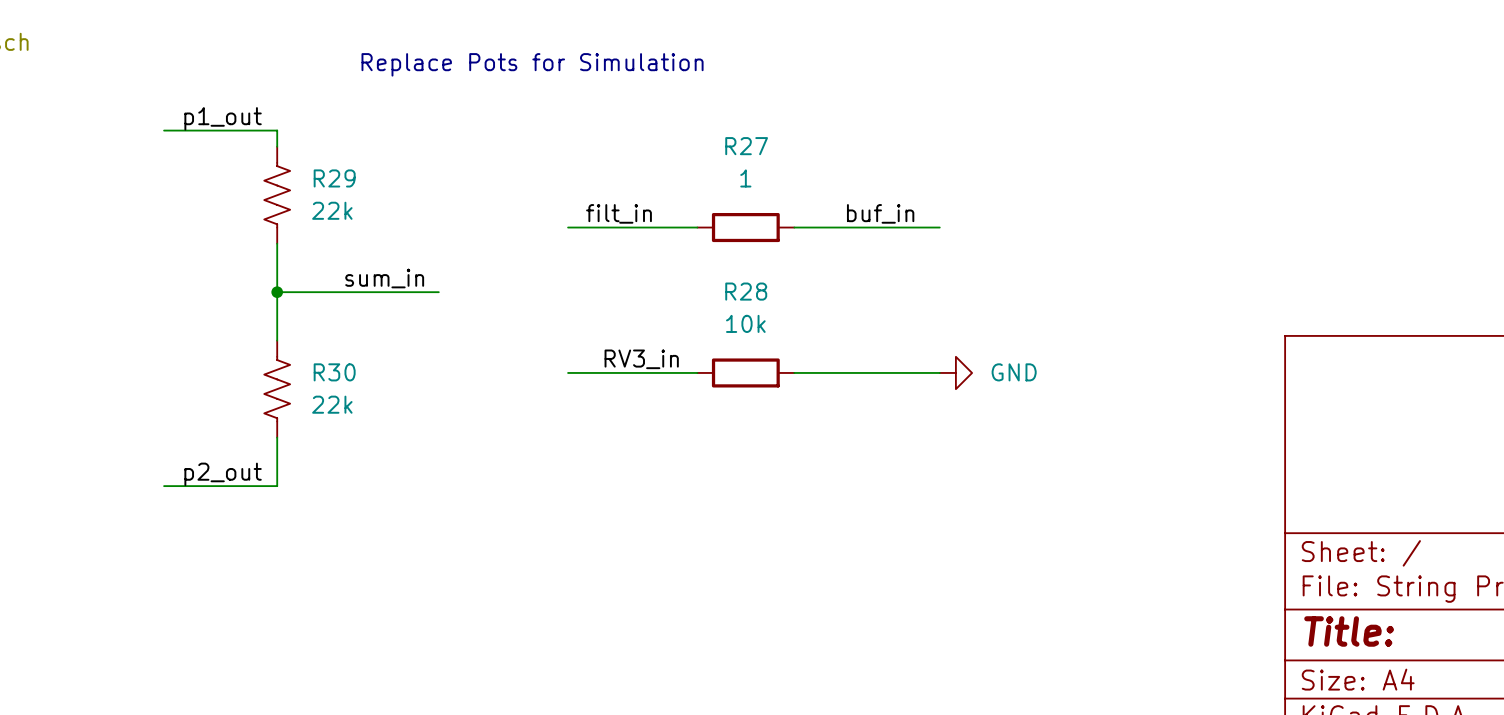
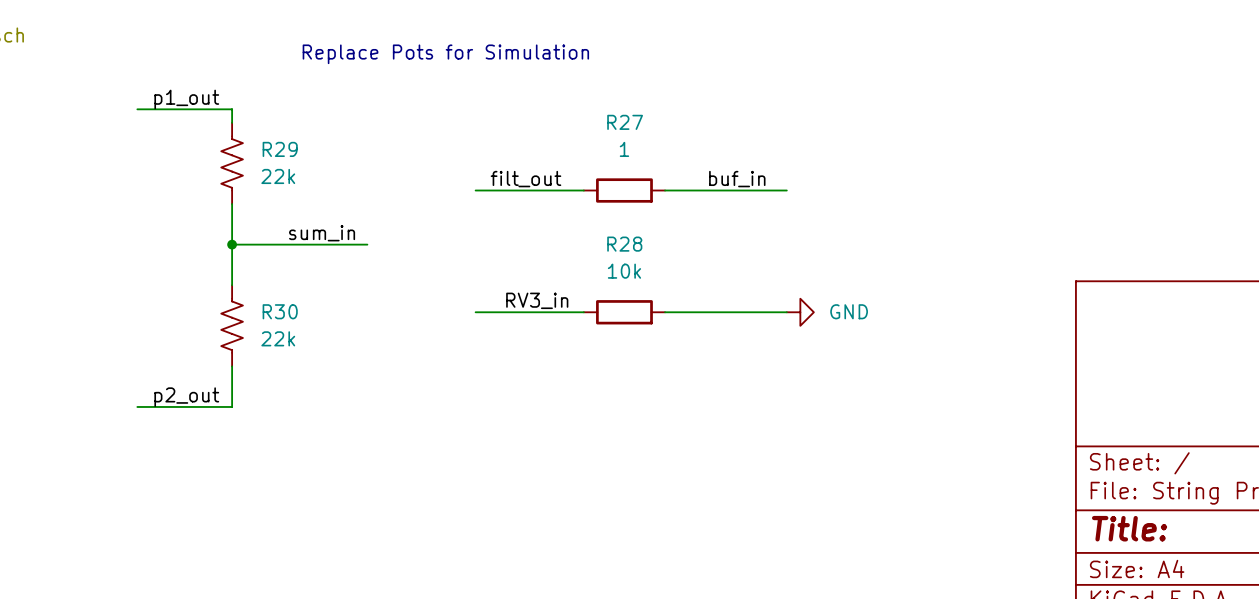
label: filt_in (618, 213) -> filt_out (525, 179)

